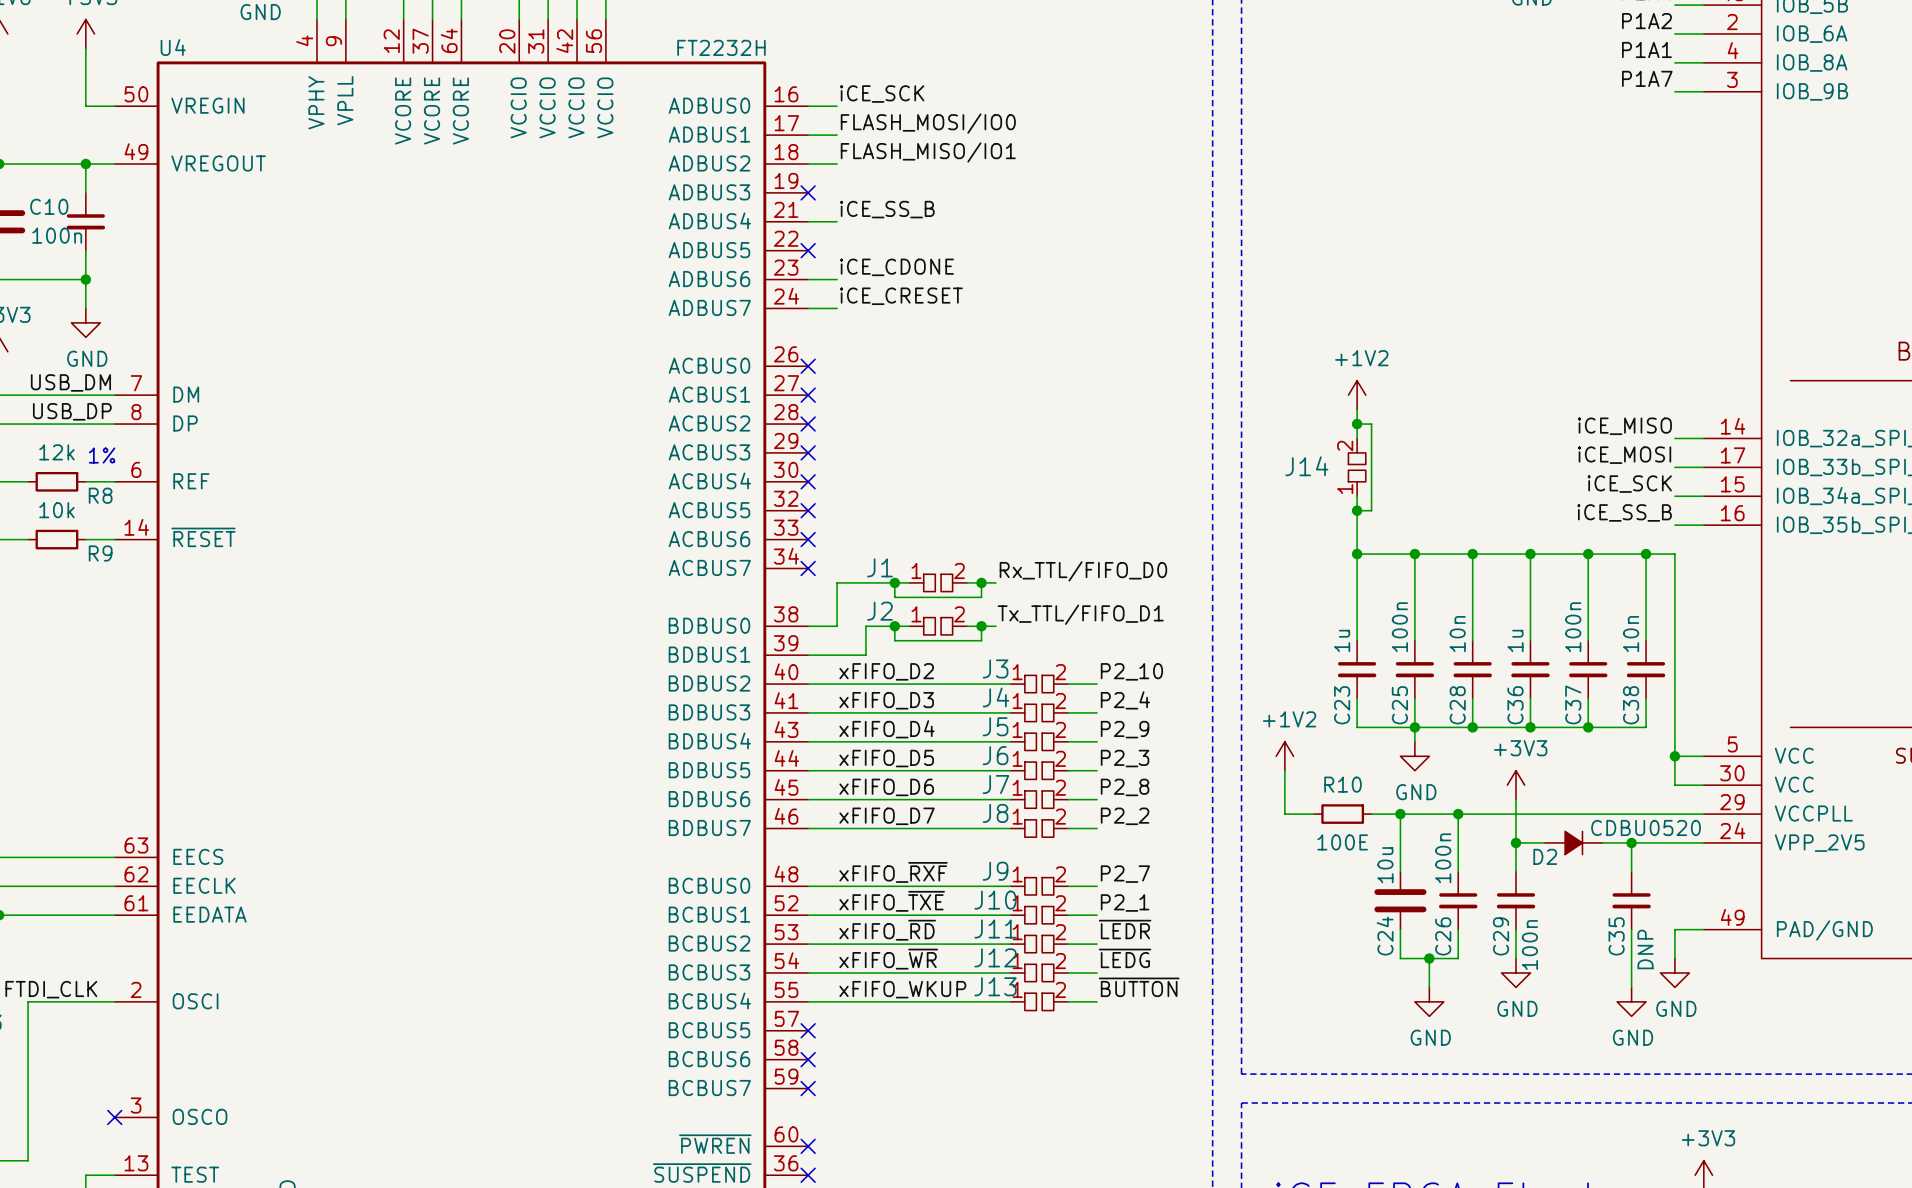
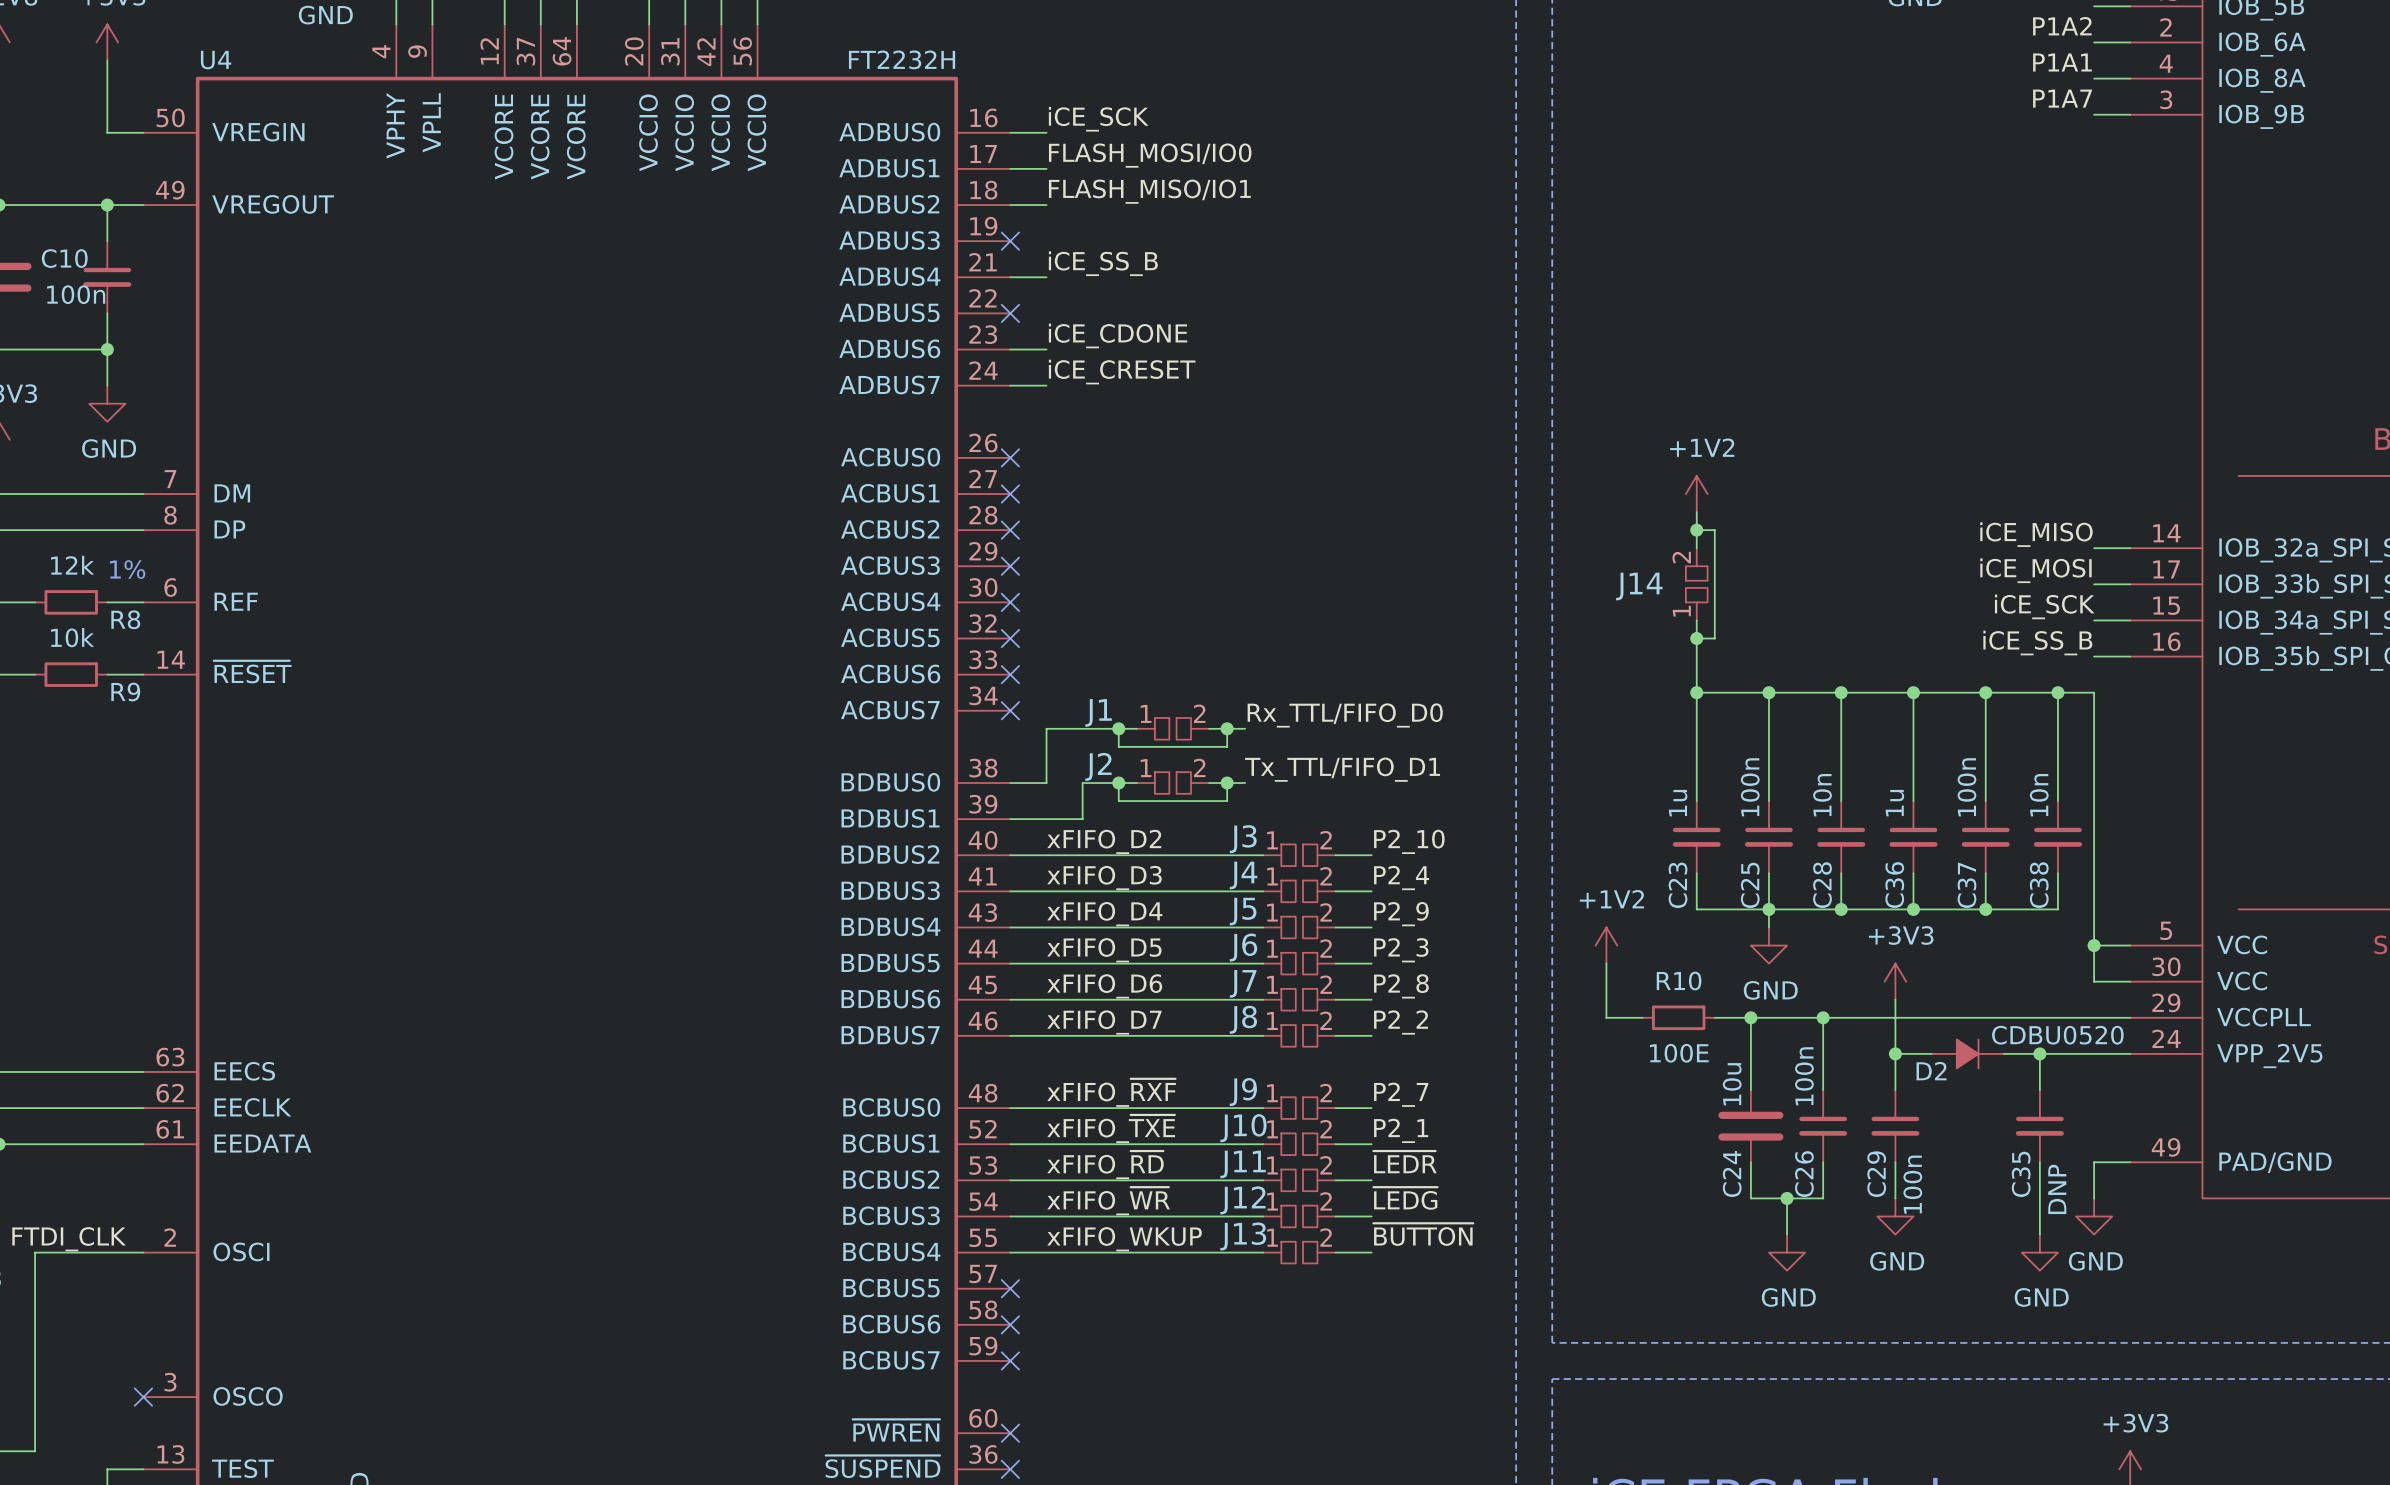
label: USB_DM (70, 382) -> none
label: USB_DP (72, 411) -> none

